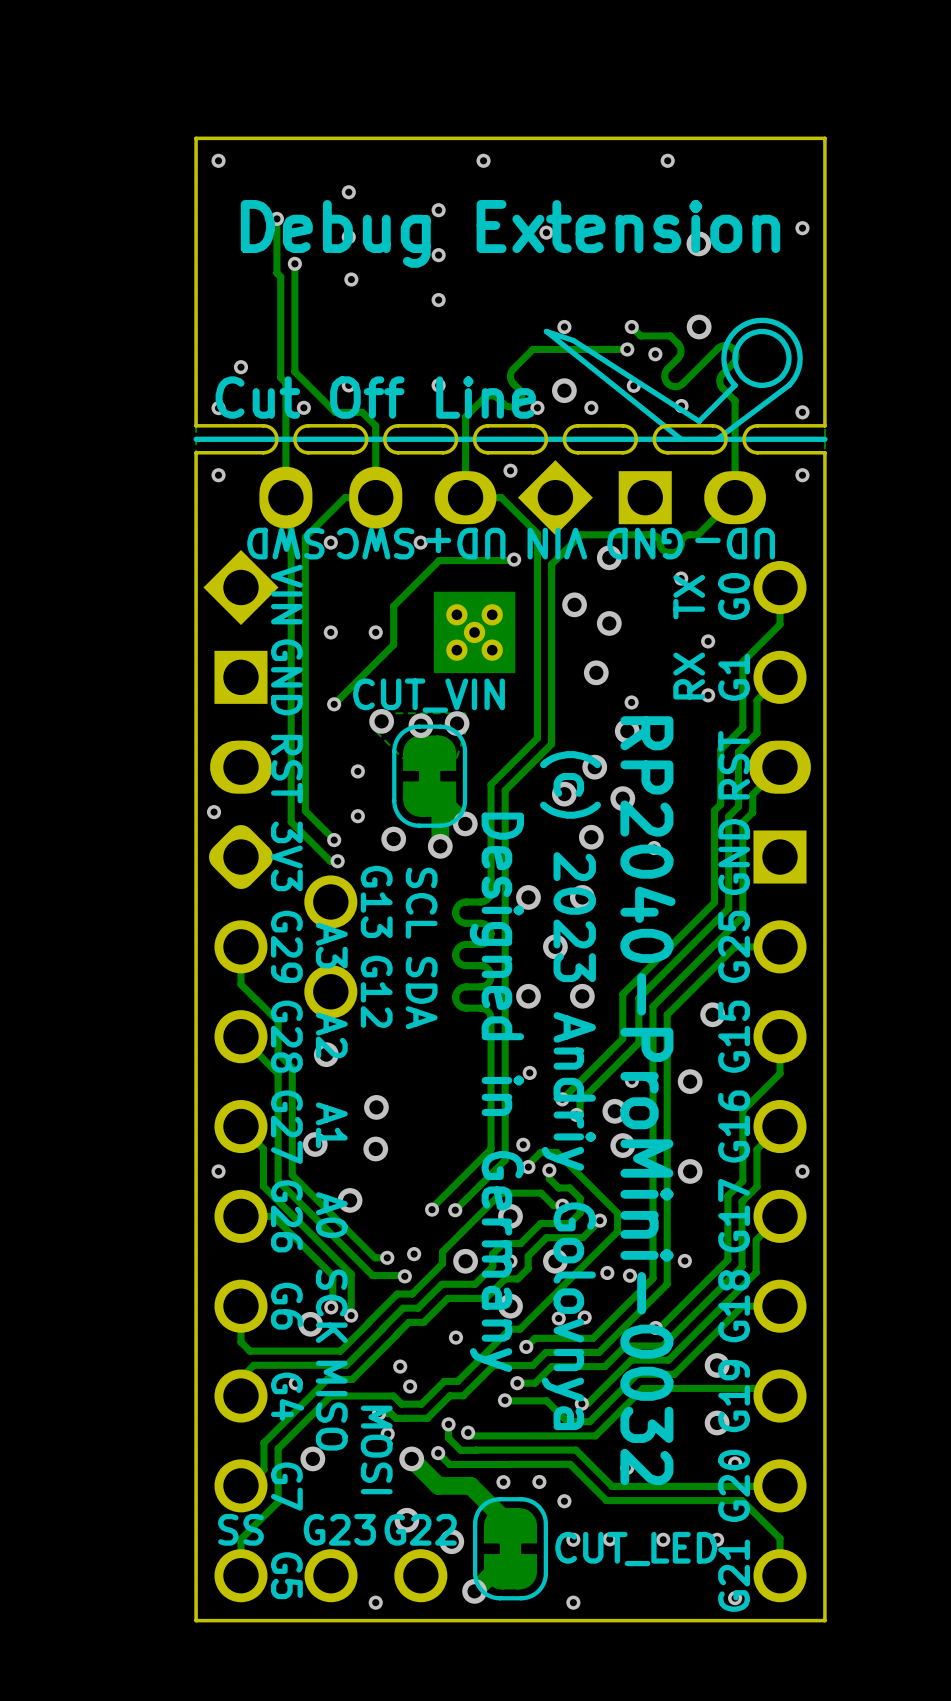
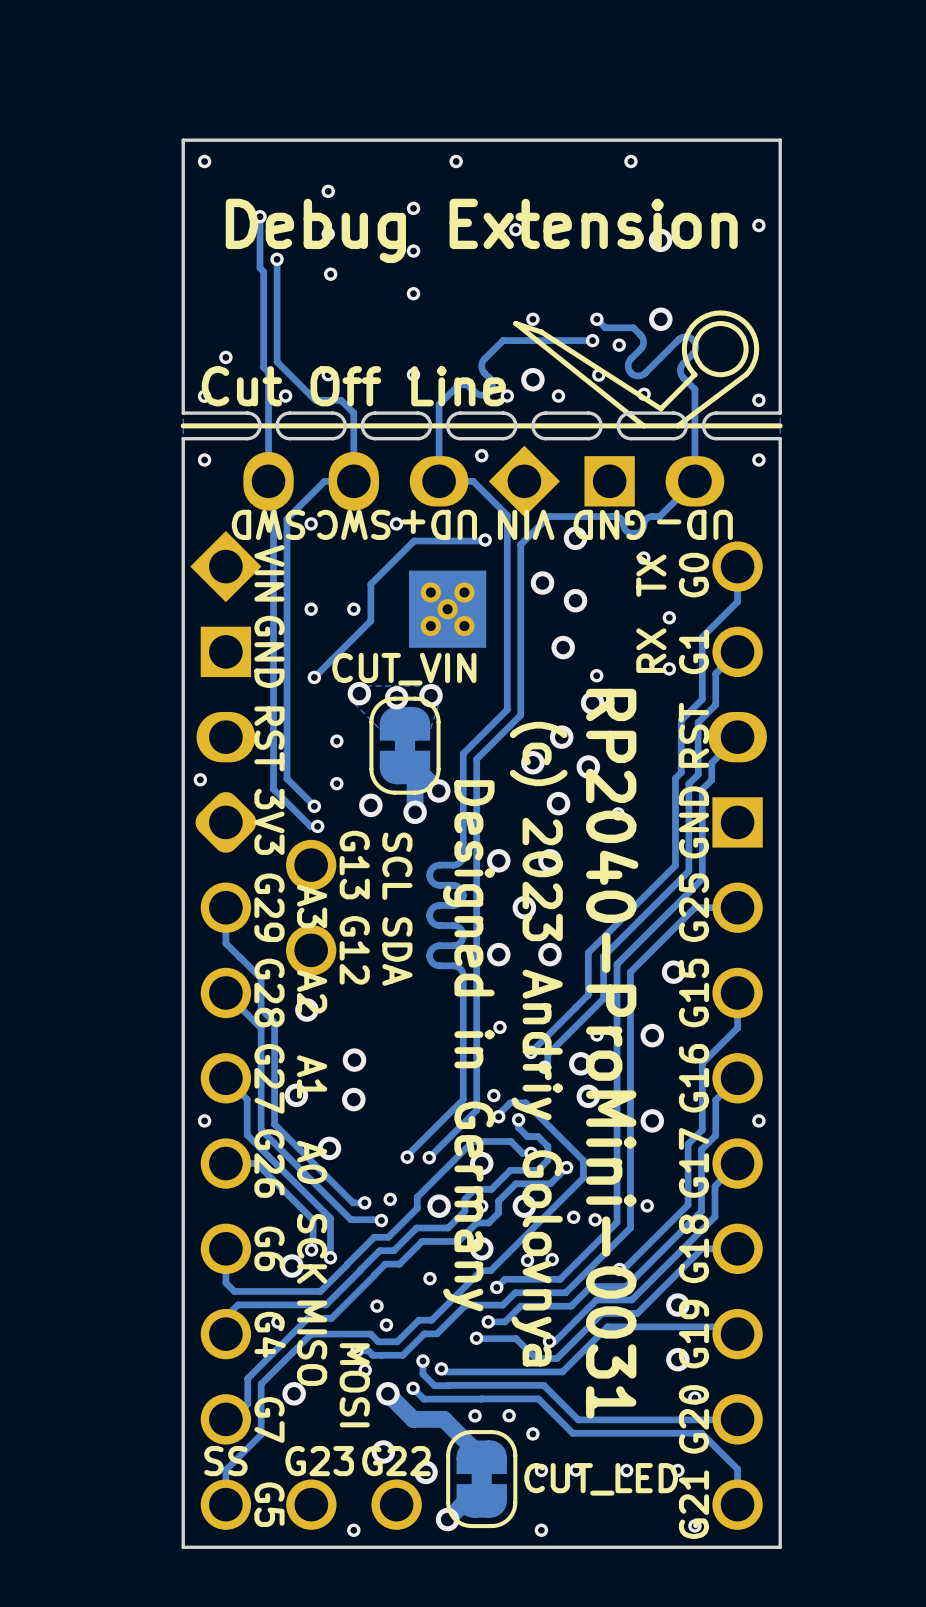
text: RP2040-ProMini-0032 (647, 1100) -> RP2040-ProMini-0031 (612, 1053)

